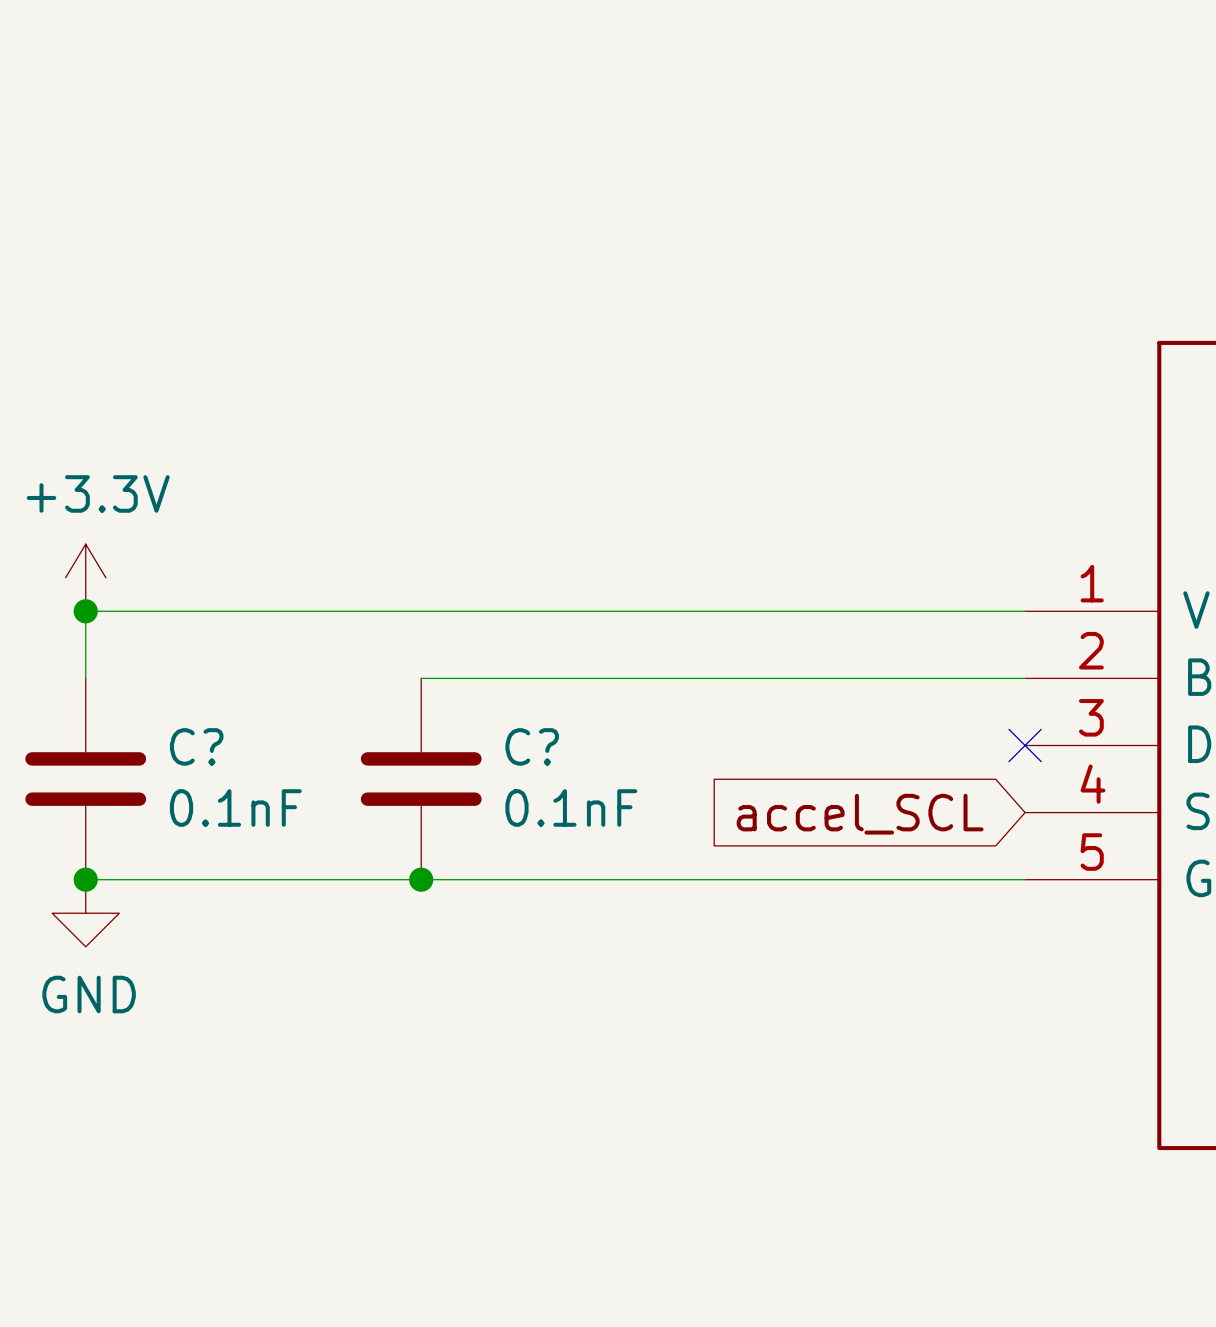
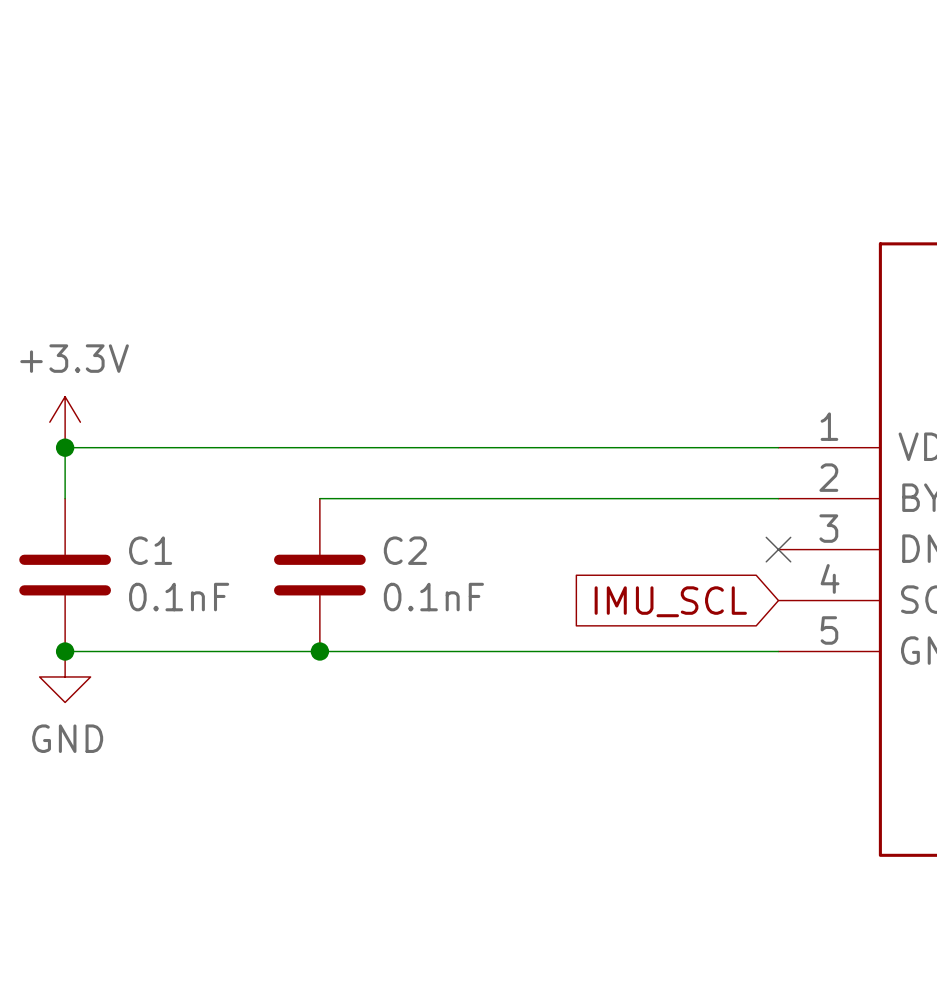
C? name: C? (196, 746) -> C1 (150, 550)
C? name: C? (532, 746) -> C2 (405, 550)
global label: accel_SCL (860, 814) -> IMU_SCL (670, 601)

